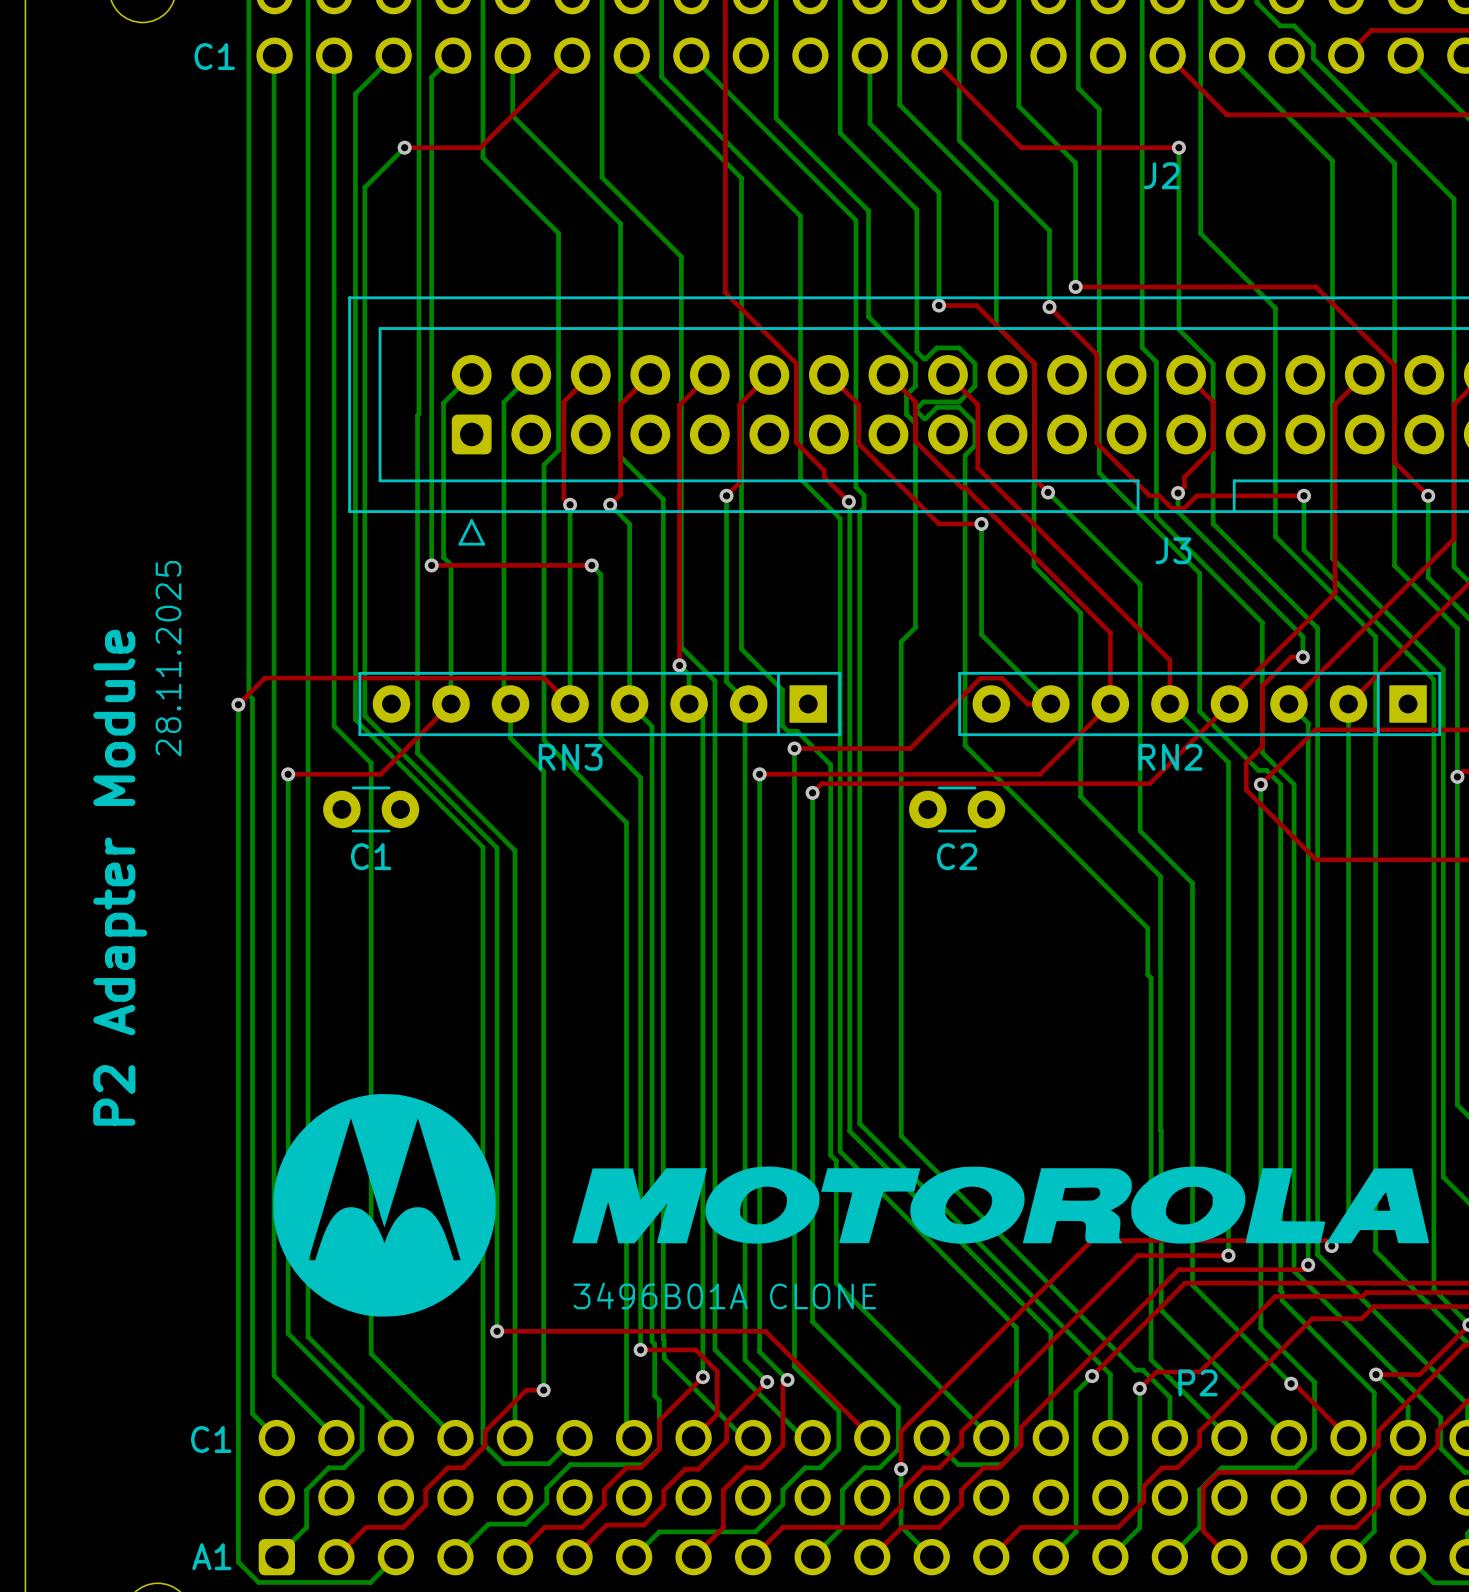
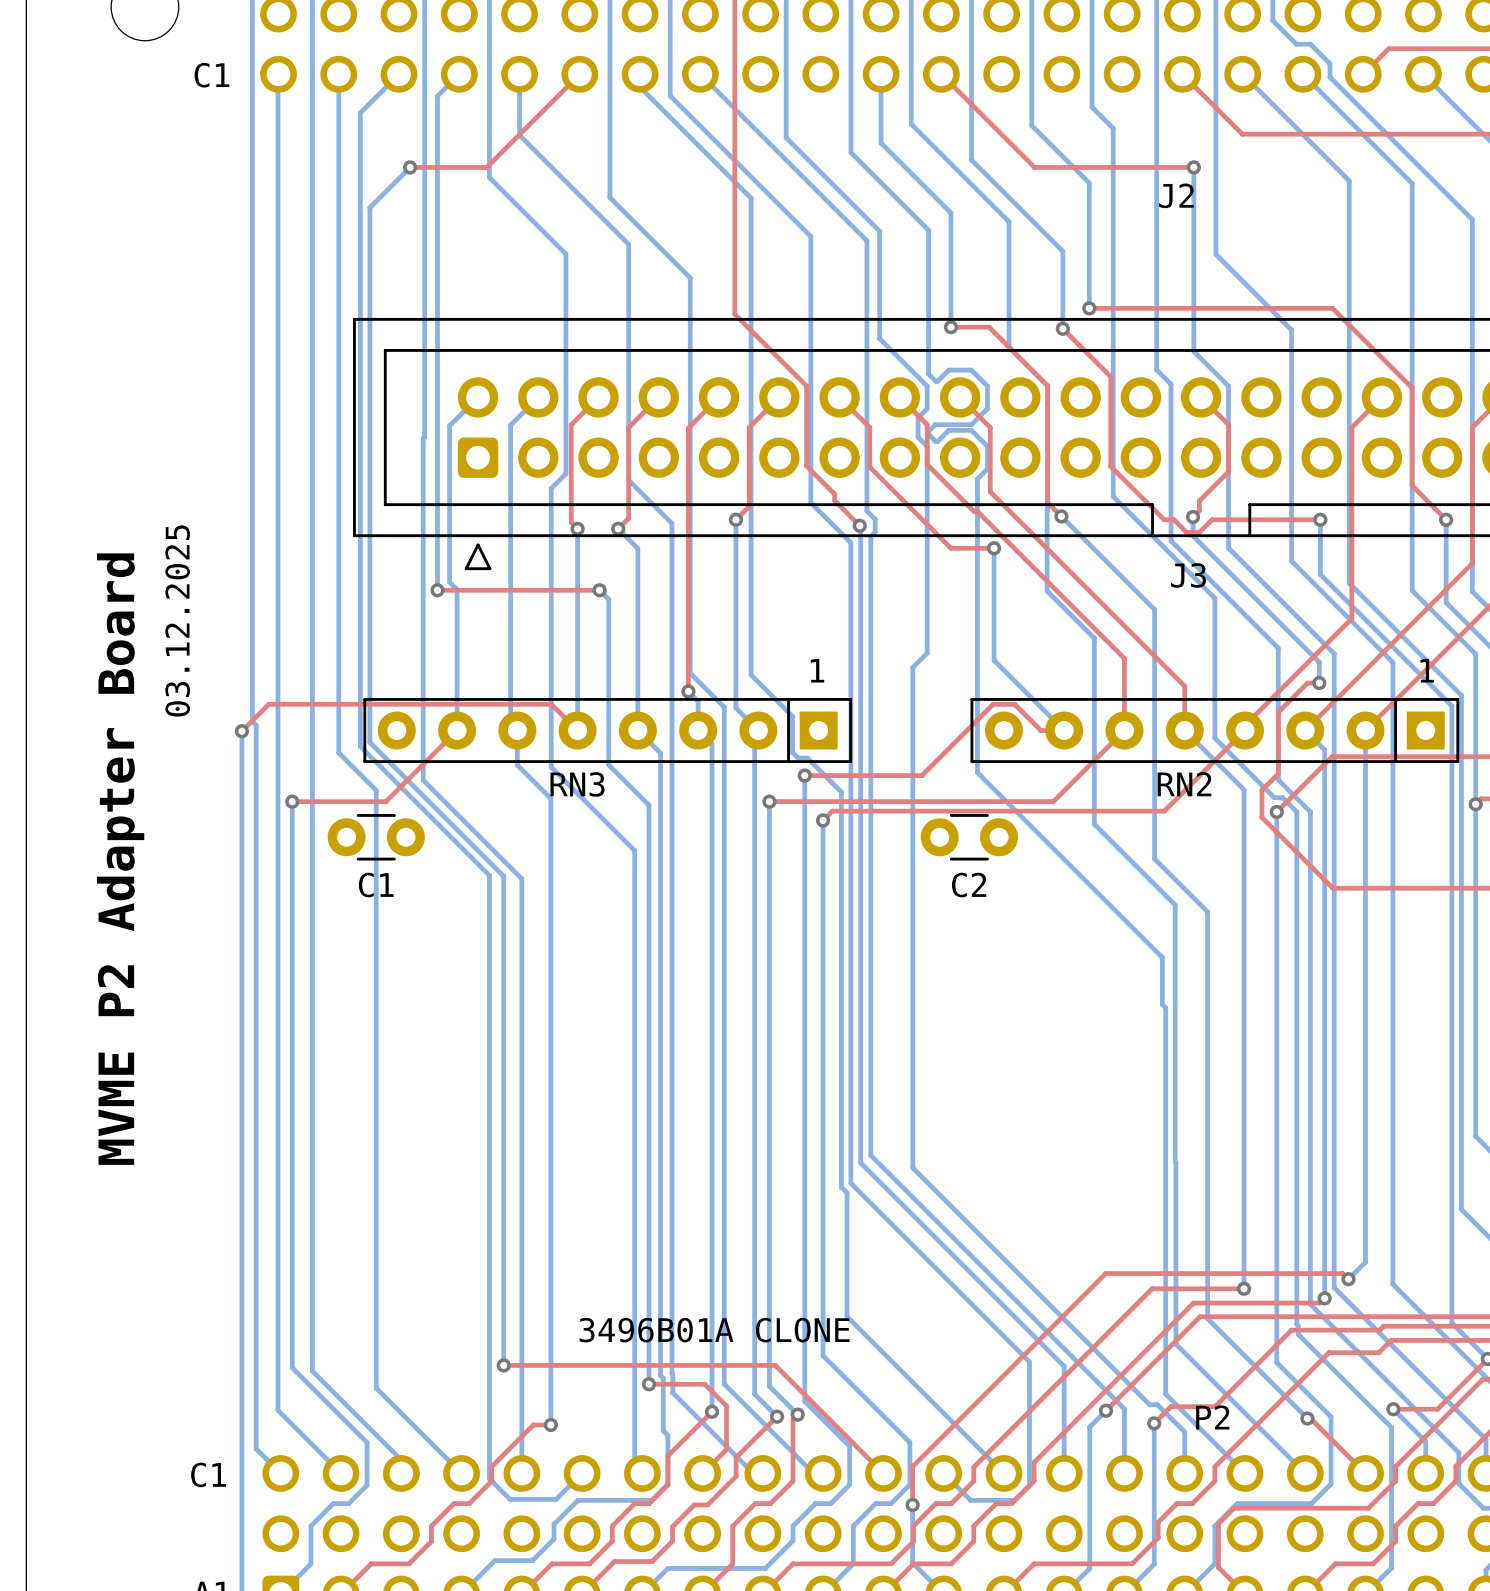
text: none -> 1 (817, 670)
text: none -> 1 (1427, 670)
text: 28.11.2025 (168, 658) -> 03.12.2025 (177, 620)
text: P2 Adapter Module (120, 877) -> MVME P2 Adapter Board (120, 859)
drawing: [273, 1094, 1430, 1317] -> none

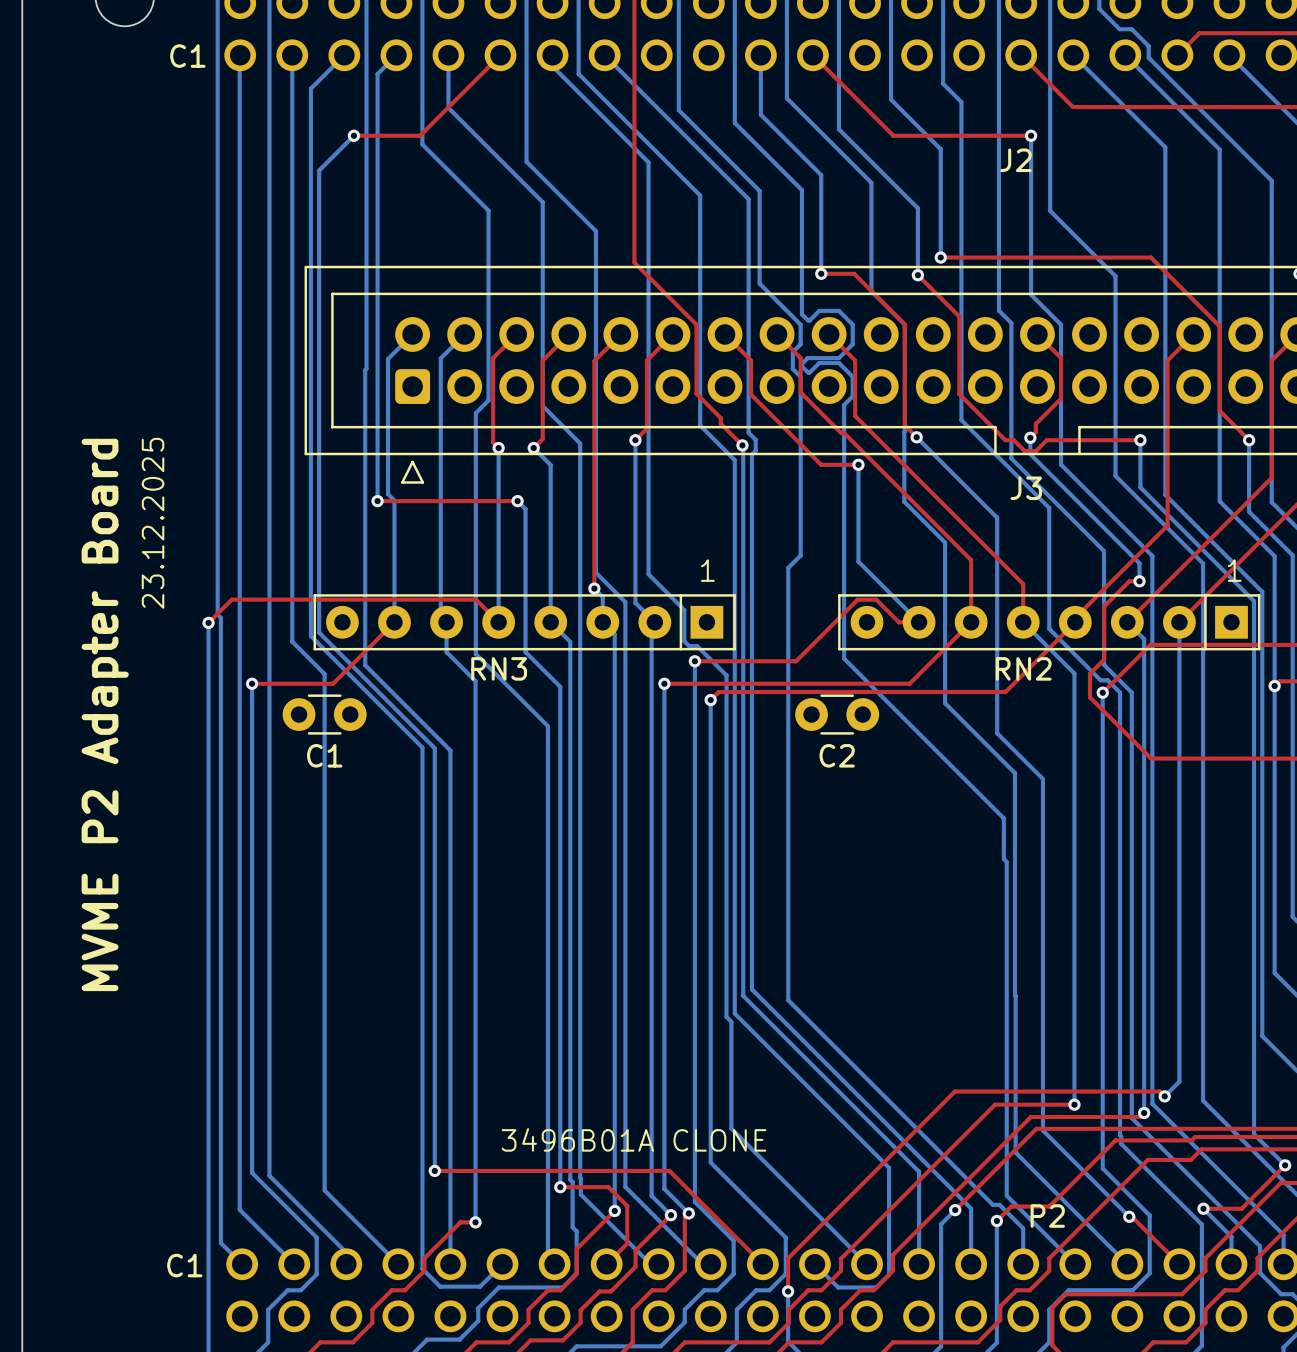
text: 03.12.2025 (177, 620) -> 23.12.2025 (153, 523)

